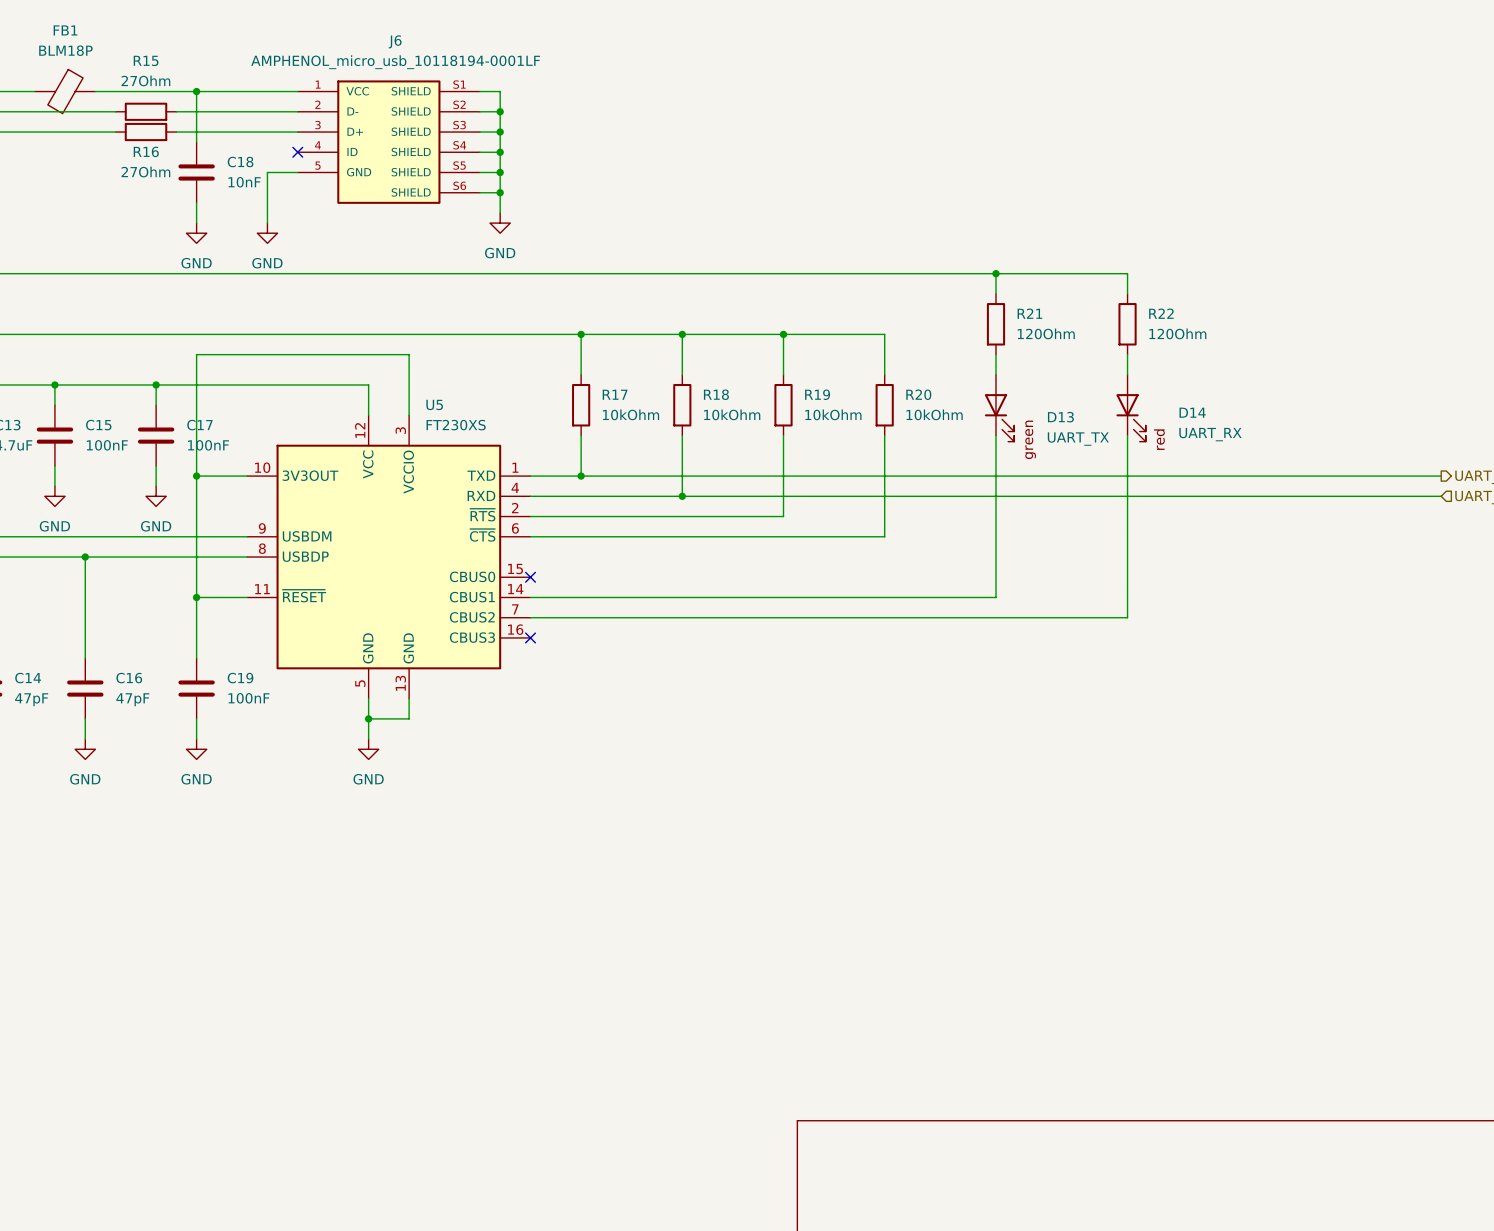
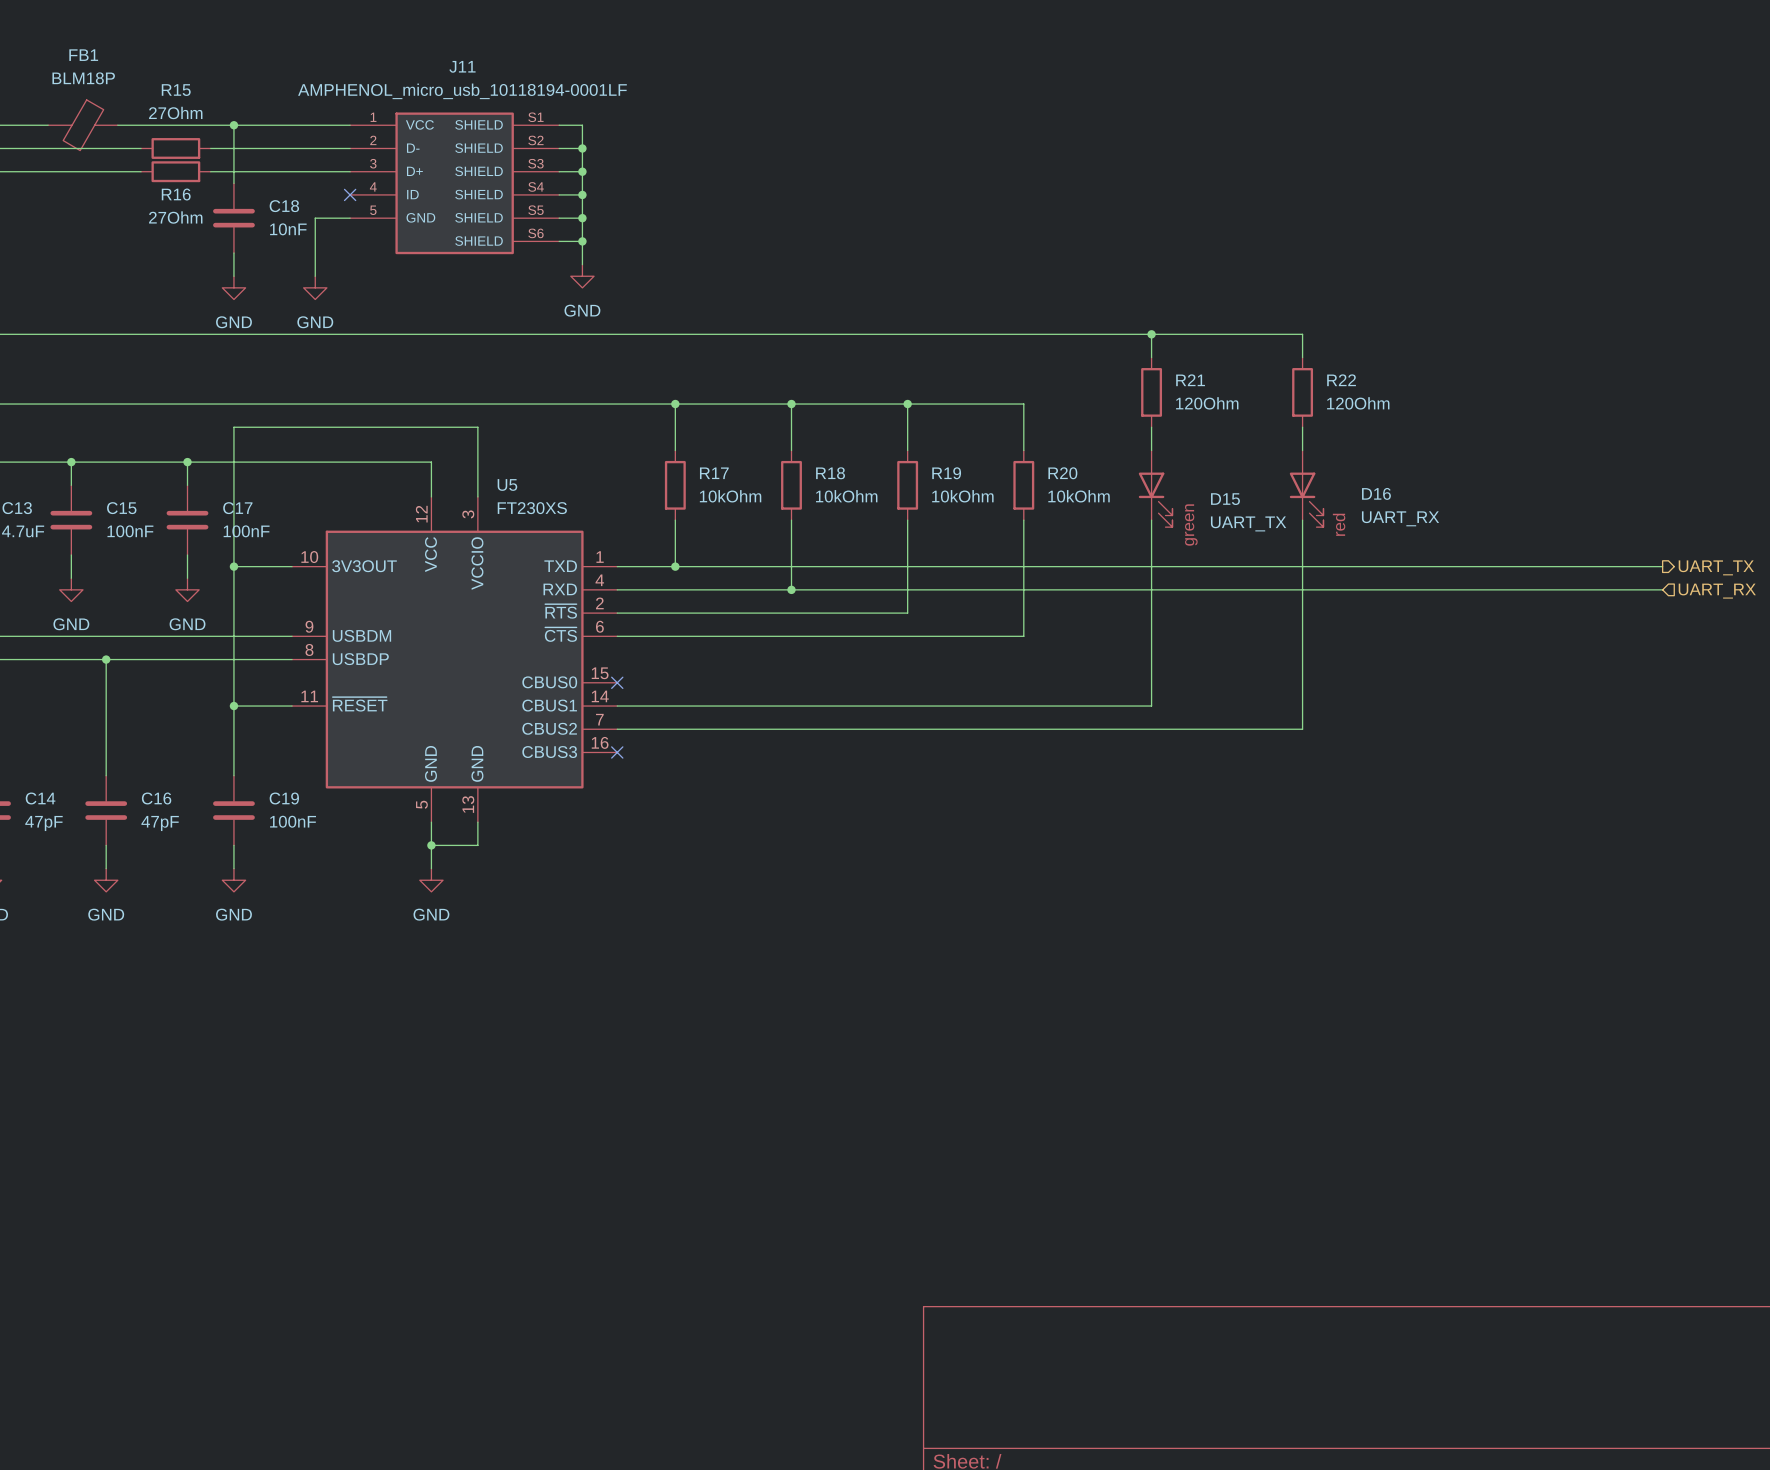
J6 name: J6 (395, 41) -> J11 (462, 66)
D14 name: D14 (1192, 412) -> D16 (1376, 493)
D13 name: D13 (1060, 417) -> D15 (1225, 499)

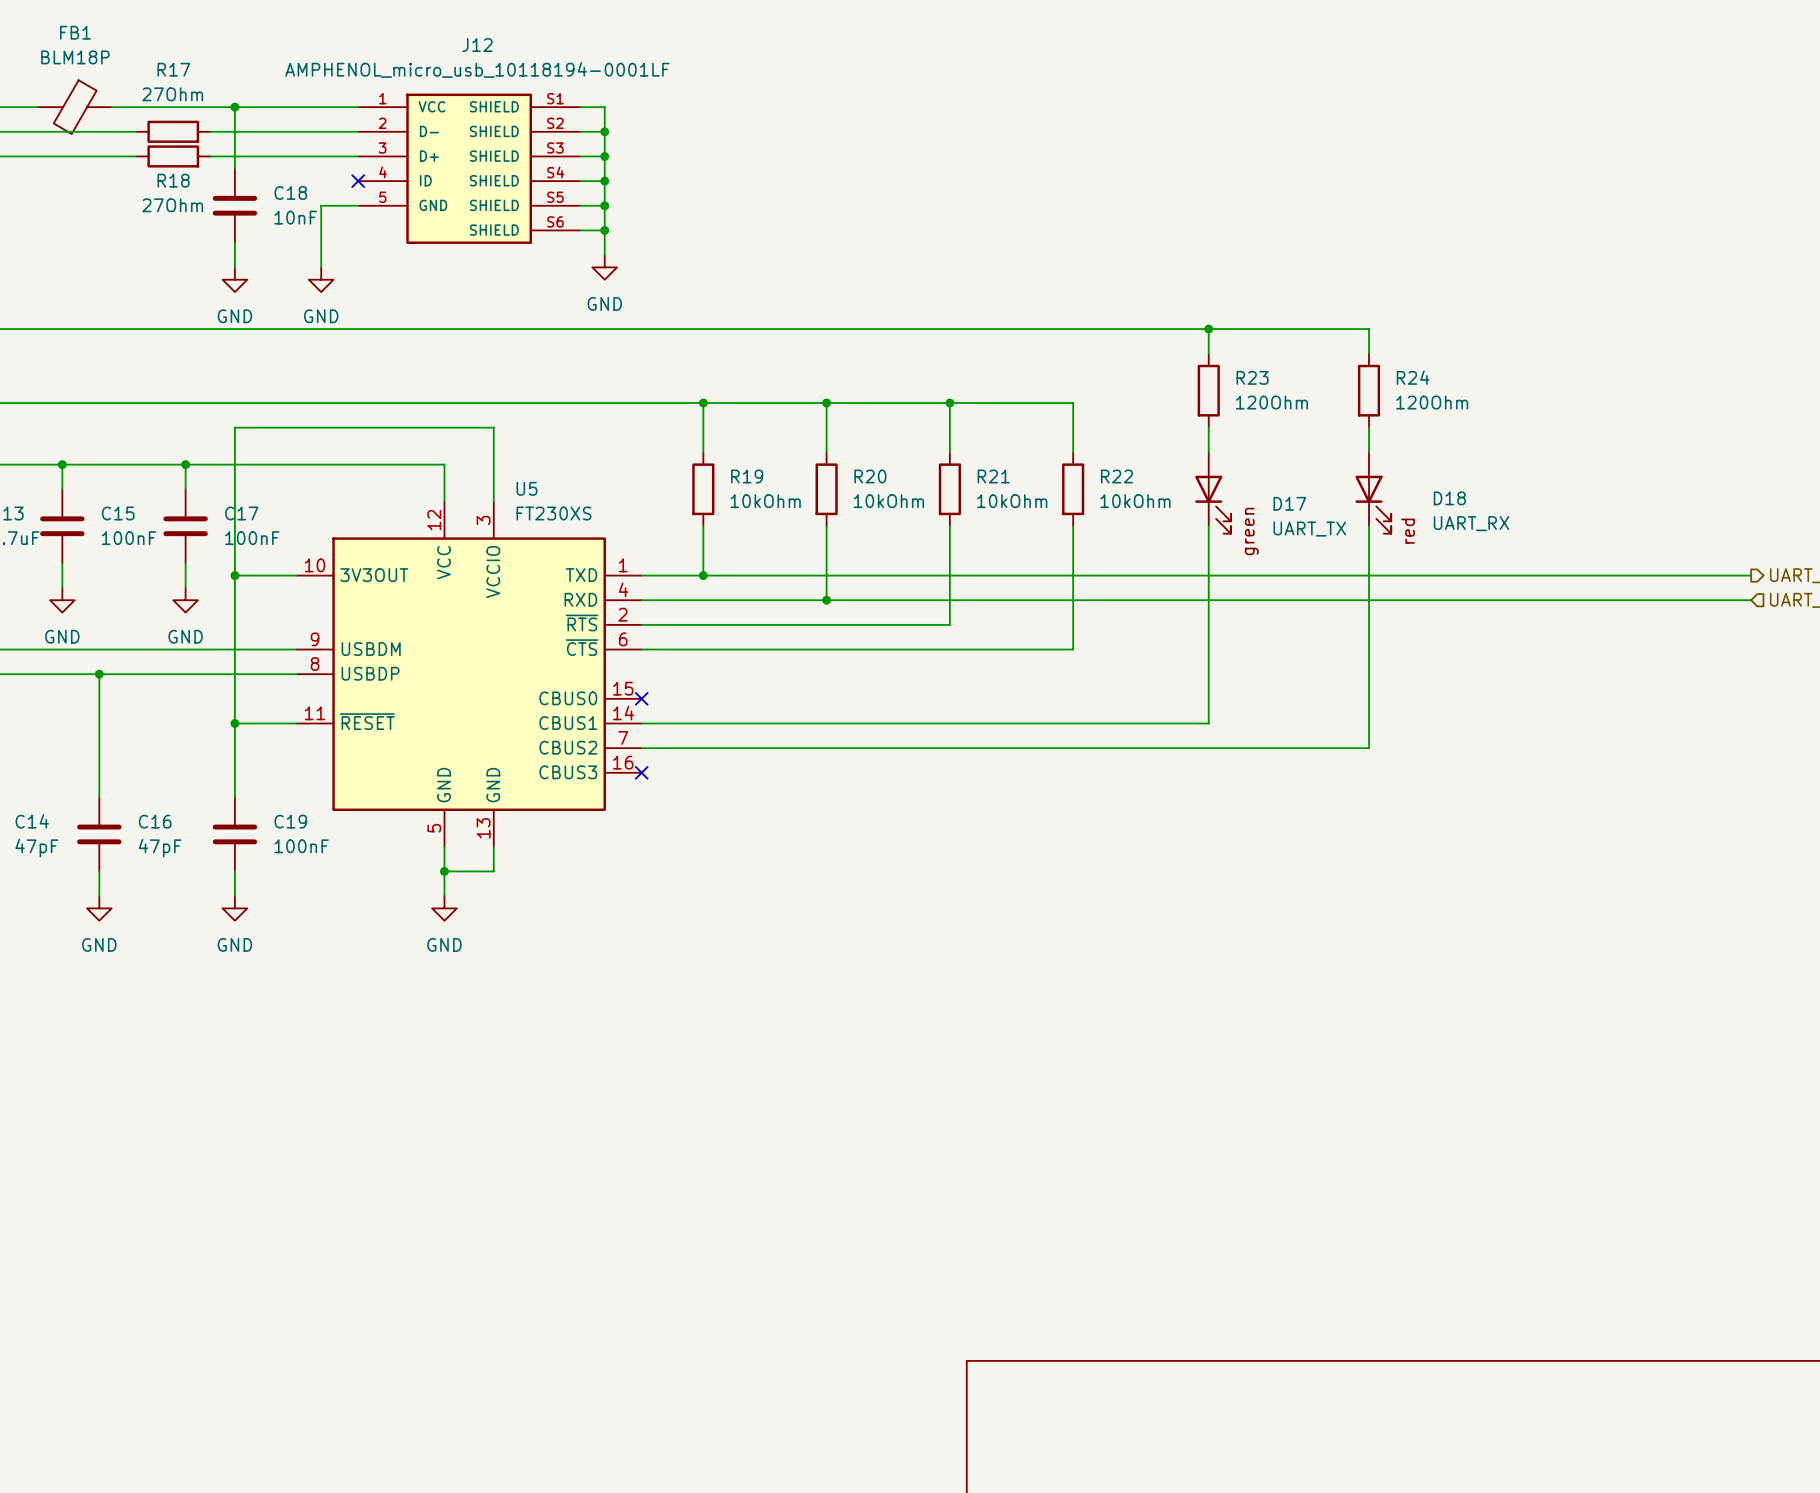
J11 name: J11 (462, 66) -> J12 (477, 45)
R15 name: R15 (176, 90) -> R17 (173, 69)
R16 name: R16 (176, 194) -> R18 (173, 180)
R21 name: R21 (1190, 380) -> R23 (1252, 377)
R22 name: R22 (1341, 380) -> R24 (1413, 377)
R17 name: R17 (714, 473) -> R19 (747, 476)
R18 name: R18 (830, 473) -> R20 (870, 476)
R19 name: R19 (946, 473) -> R21 (993, 476)
R20 name: R20 (1062, 473) -> R22 (1116, 476)
D16 name: D16 (1376, 493) -> D18 (1449, 498)
D15 name: D15 (1225, 499) -> D17 (1289, 503)

